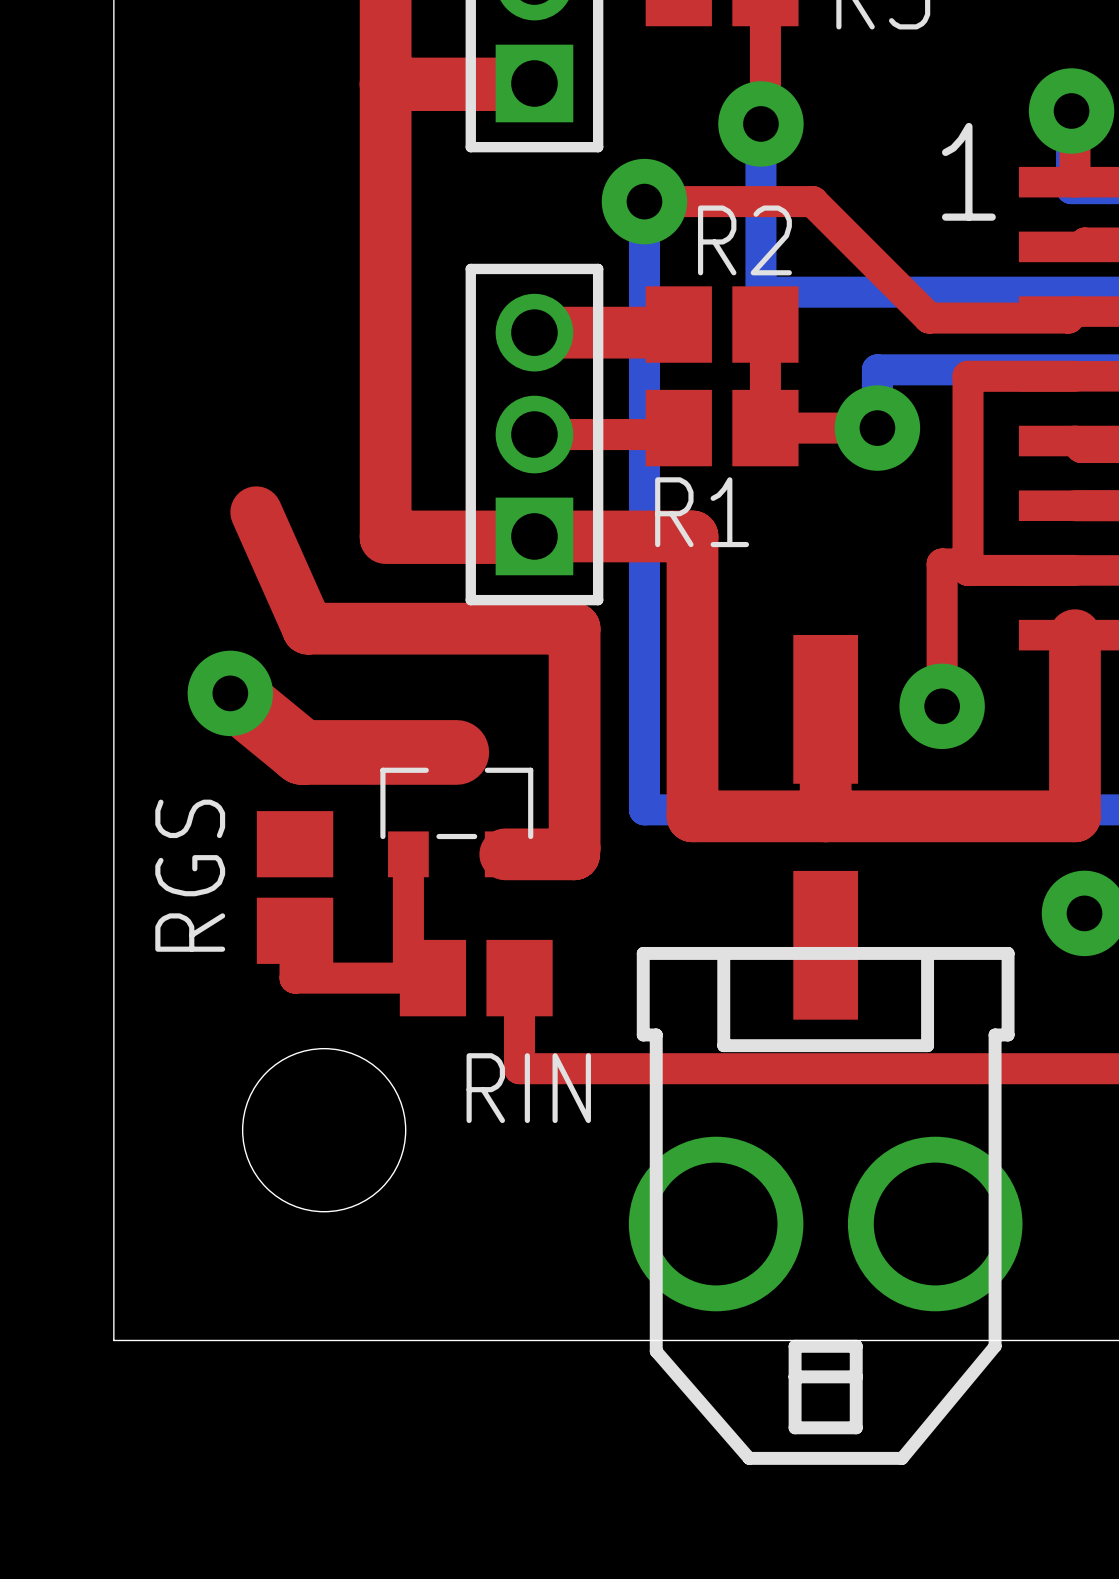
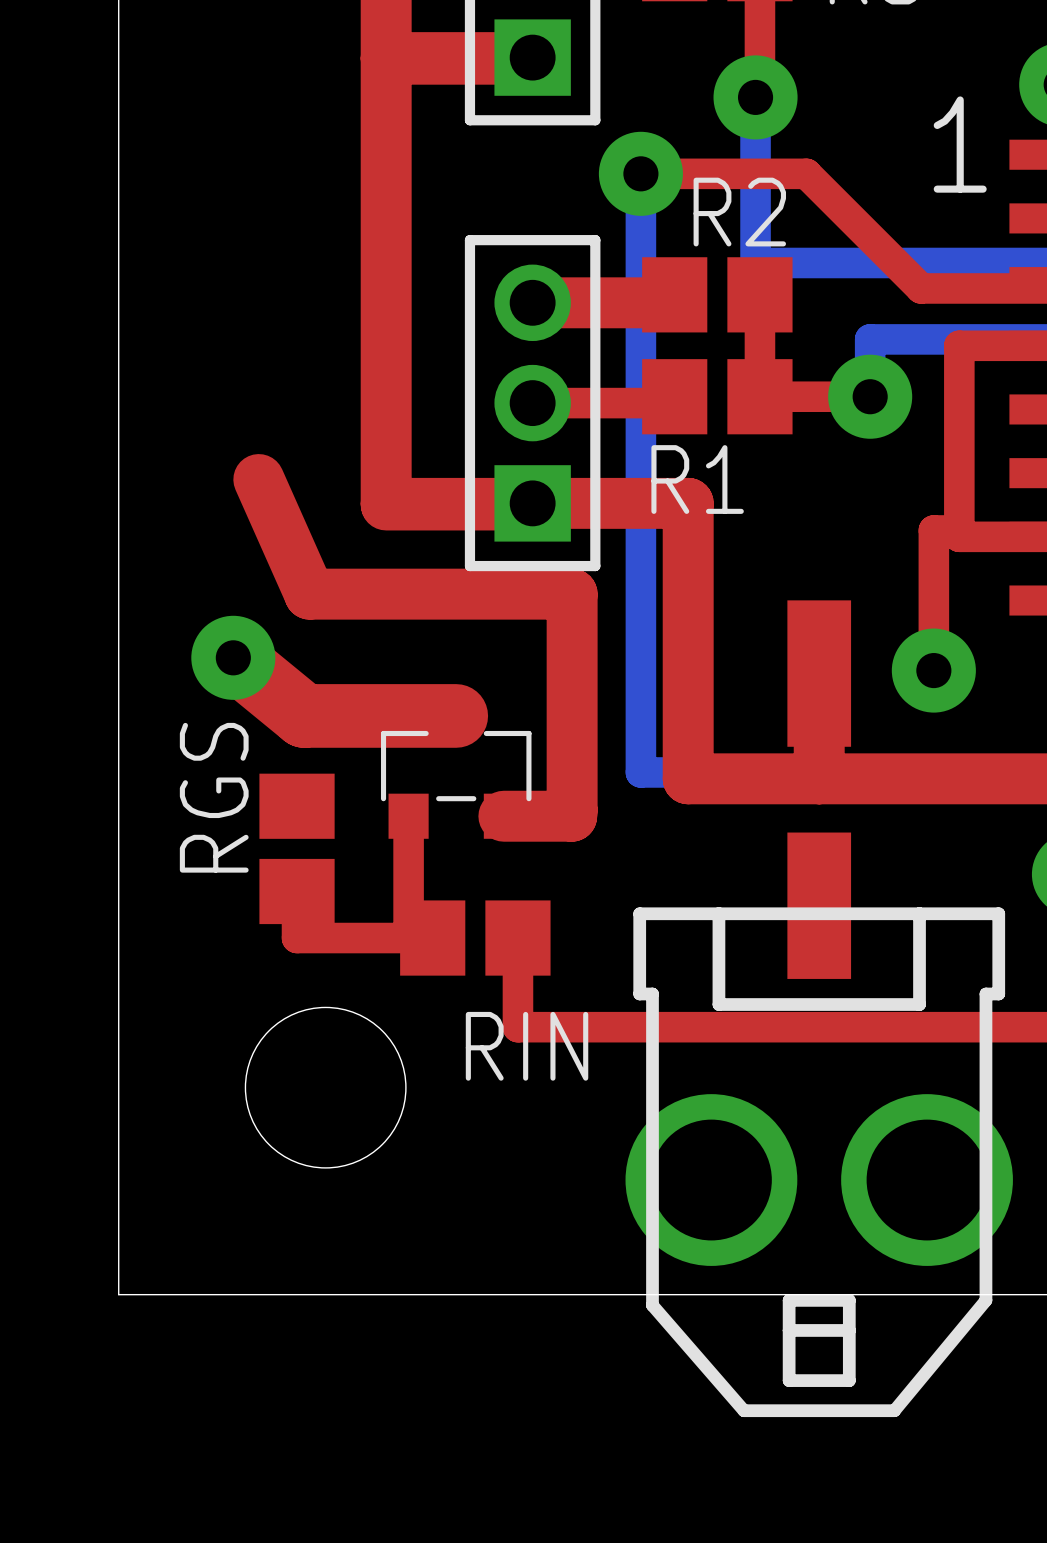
RGS name position: RGS (190, 875) -> RGS (214, 797)

